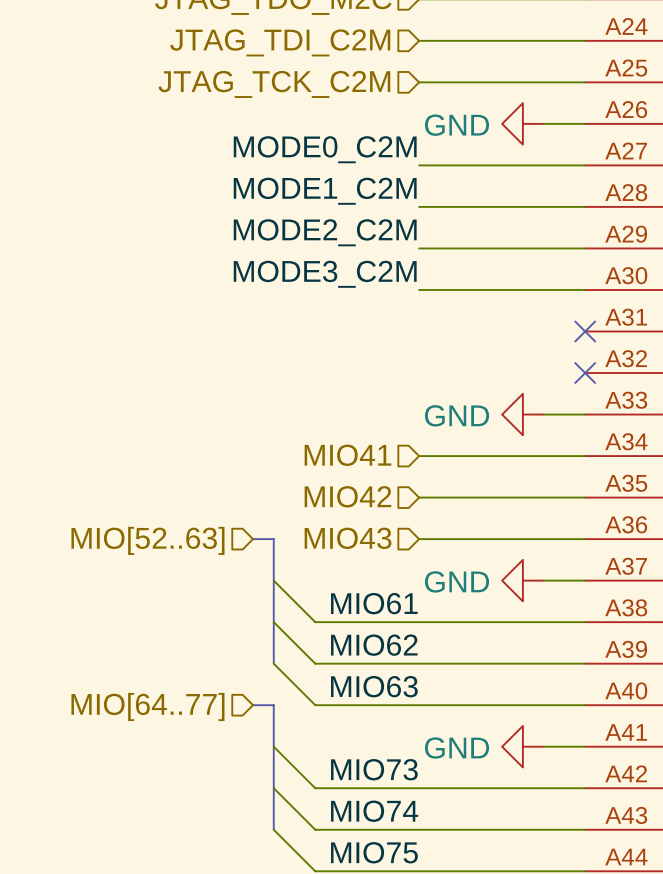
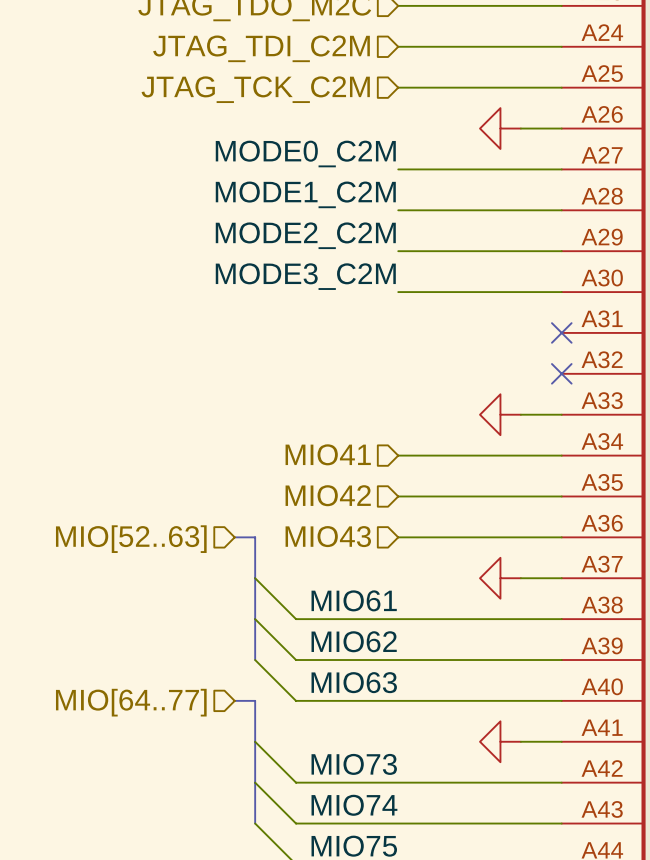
power symbol text: GND (457, 125) -> none
power symbol text: GND (457, 415) -> none
power symbol text: GND (457, 581) -> none
power symbol text: GND (457, 748) -> none

